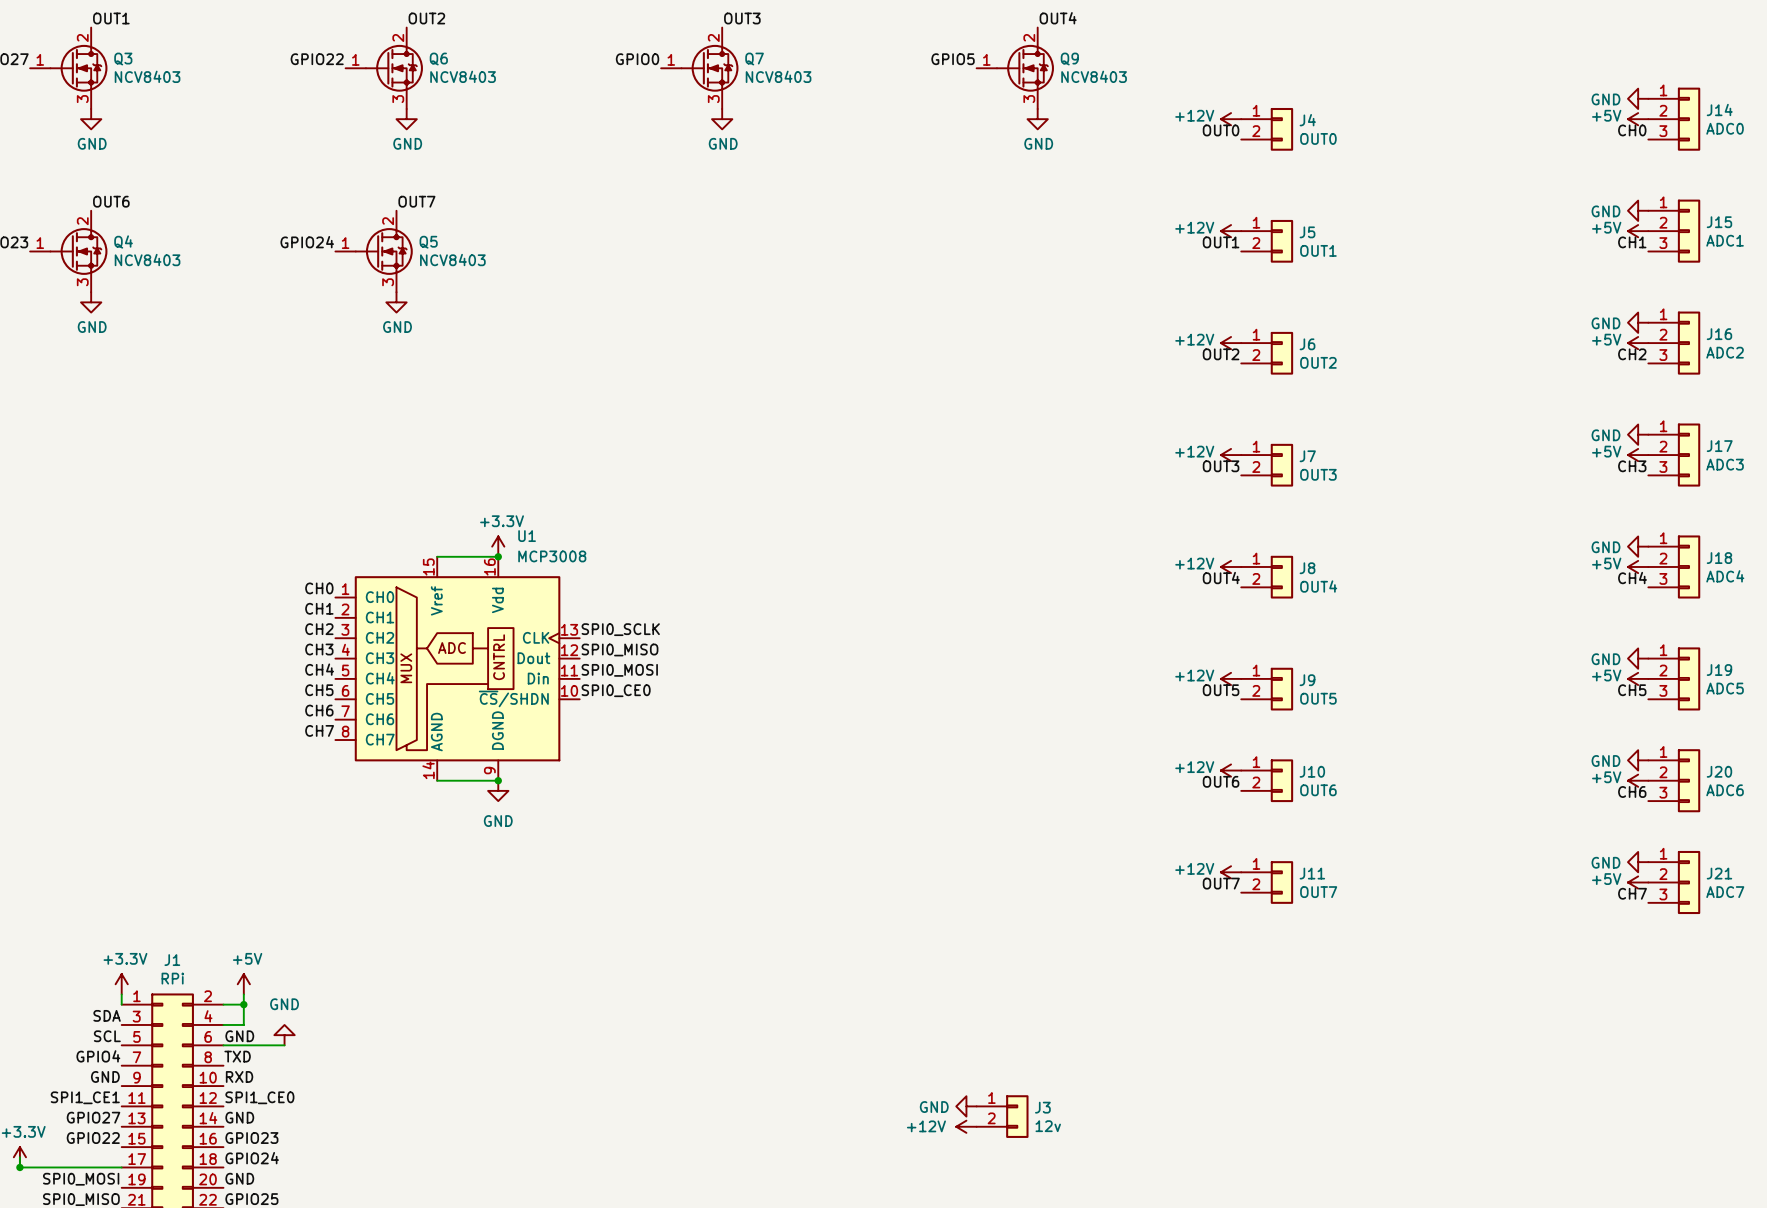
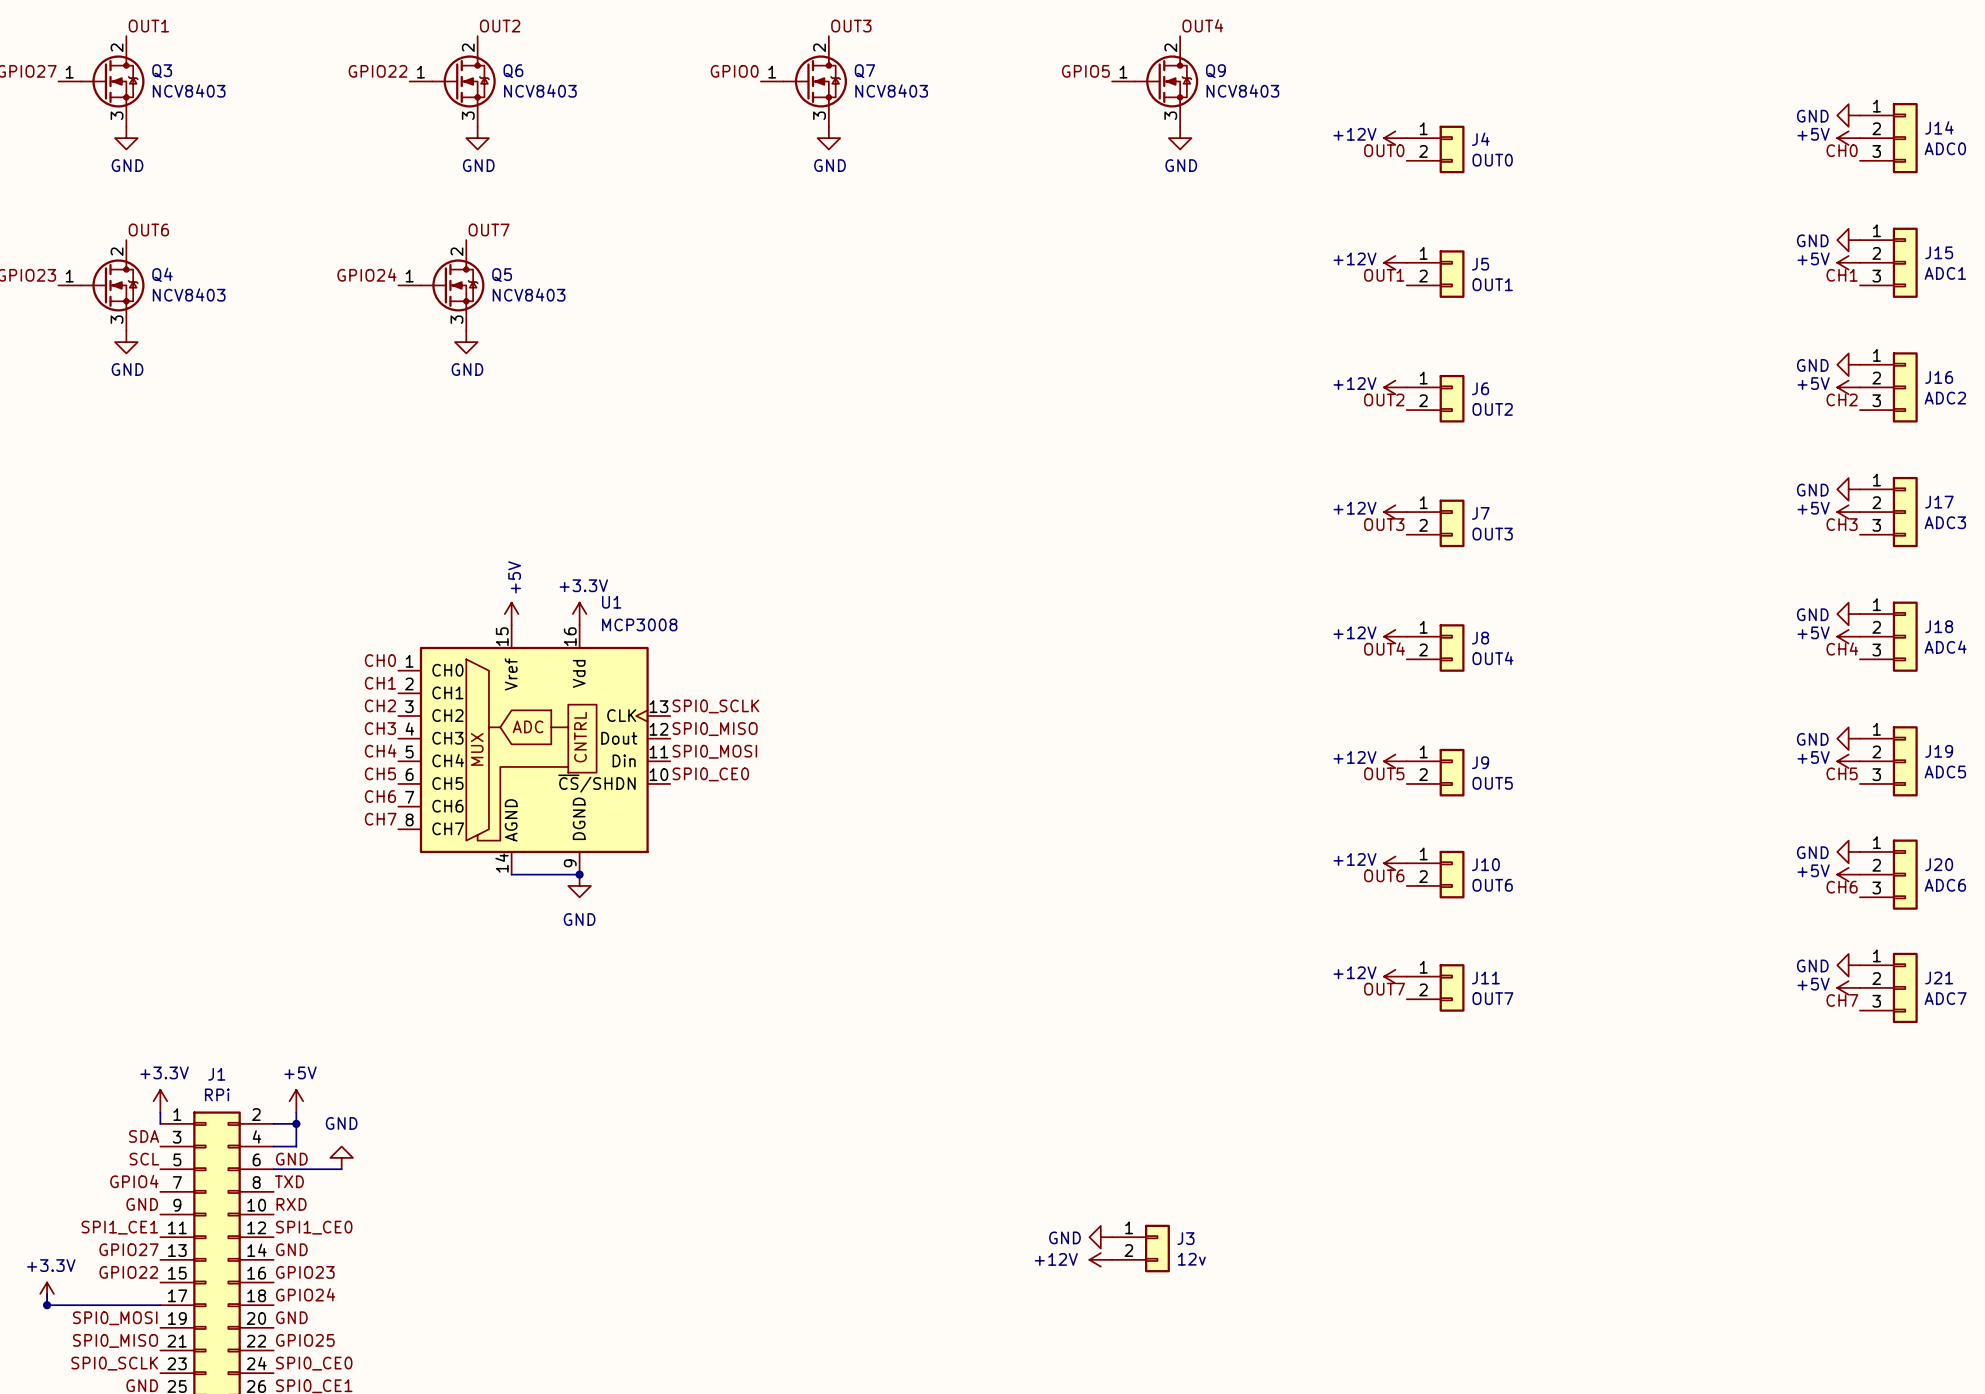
power symbol: none -> +5V (511, 614)
wire: (437, 556) (498, 556) -> none
junction: (498, 556) -> none

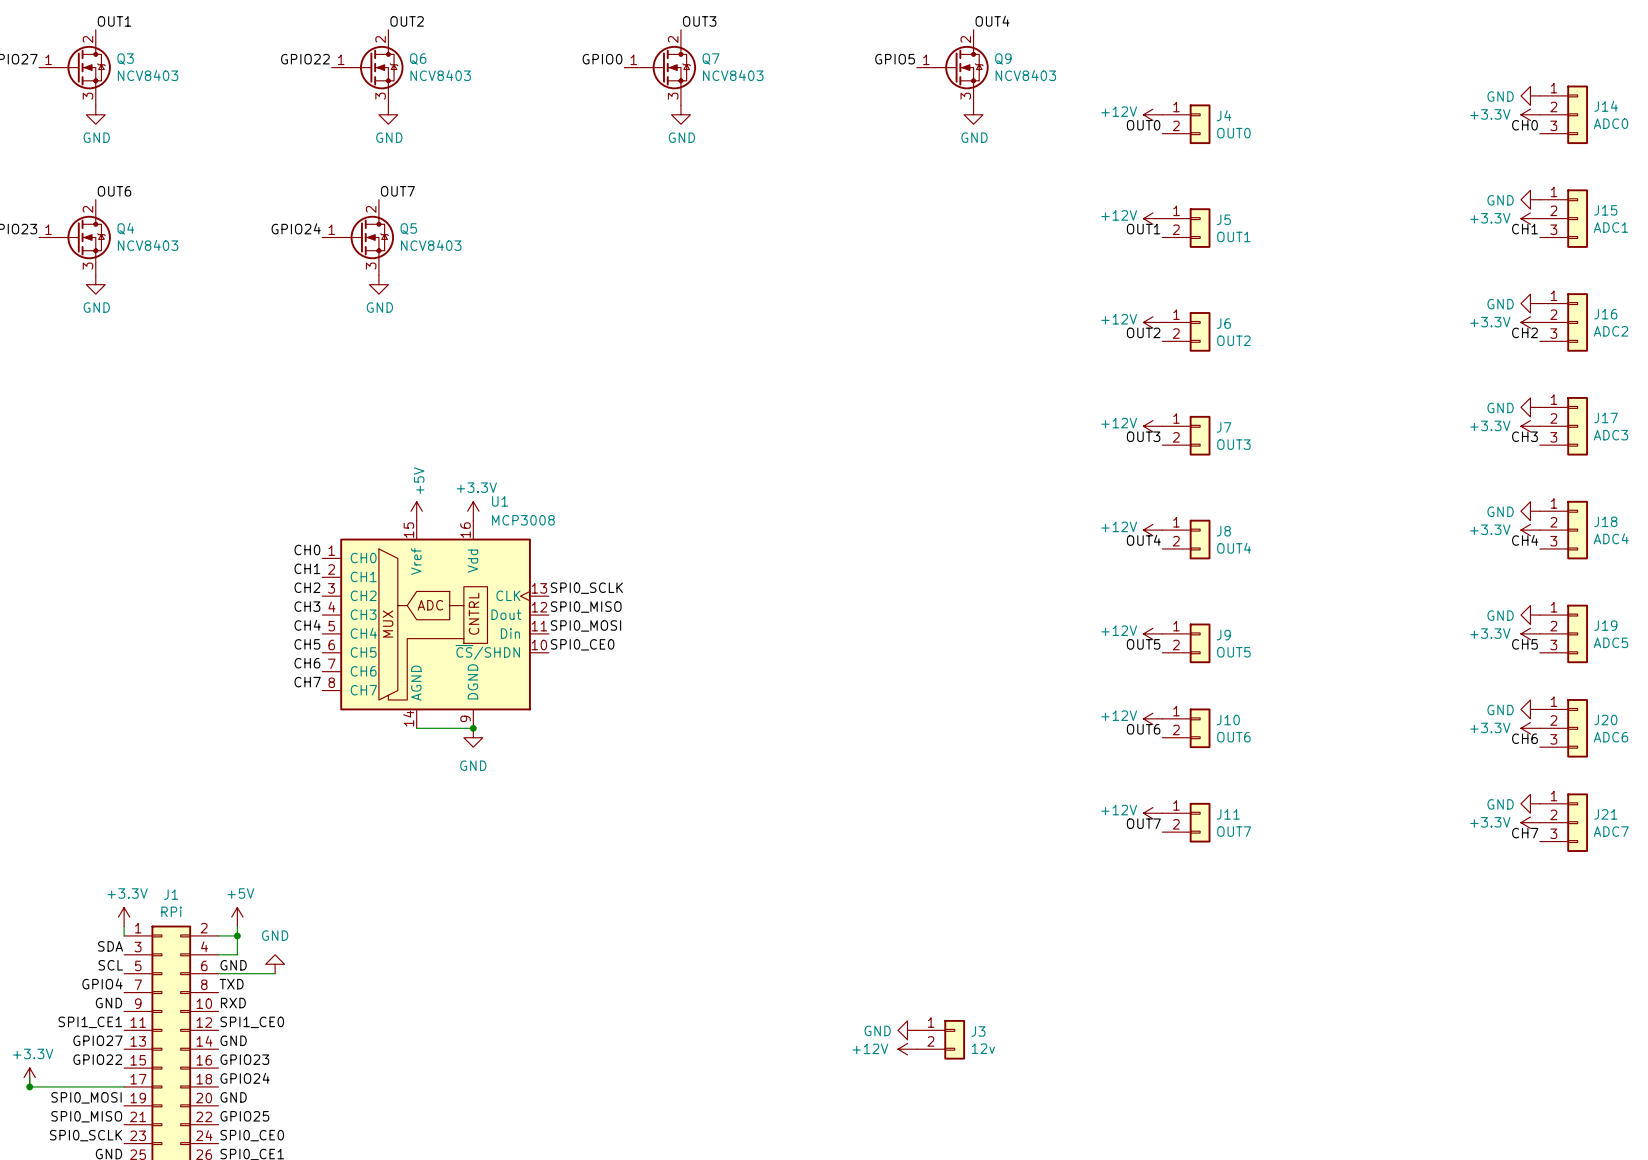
power symbol: +5V (1848, 138) -> +3.3V (1530, 114)
power symbol: +5V (1848, 262) -> +3.3V (1530, 218)
power symbol: +5V (1848, 387) -> +3.3V (1530, 322)
power symbol: +5V (1848, 512) -> +3.3V (1530, 426)
power symbol: +5V (1848, 636) -> +3.3V (1530, 530)
power symbol: +5V (1848, 761) -> +3.3V (1530, 633)
power symbol: +5V (1848, 874) -> +3.3V (1530, 728)
power symbol: +5V (1848, 987) -> +3.3V (1530, 822)

